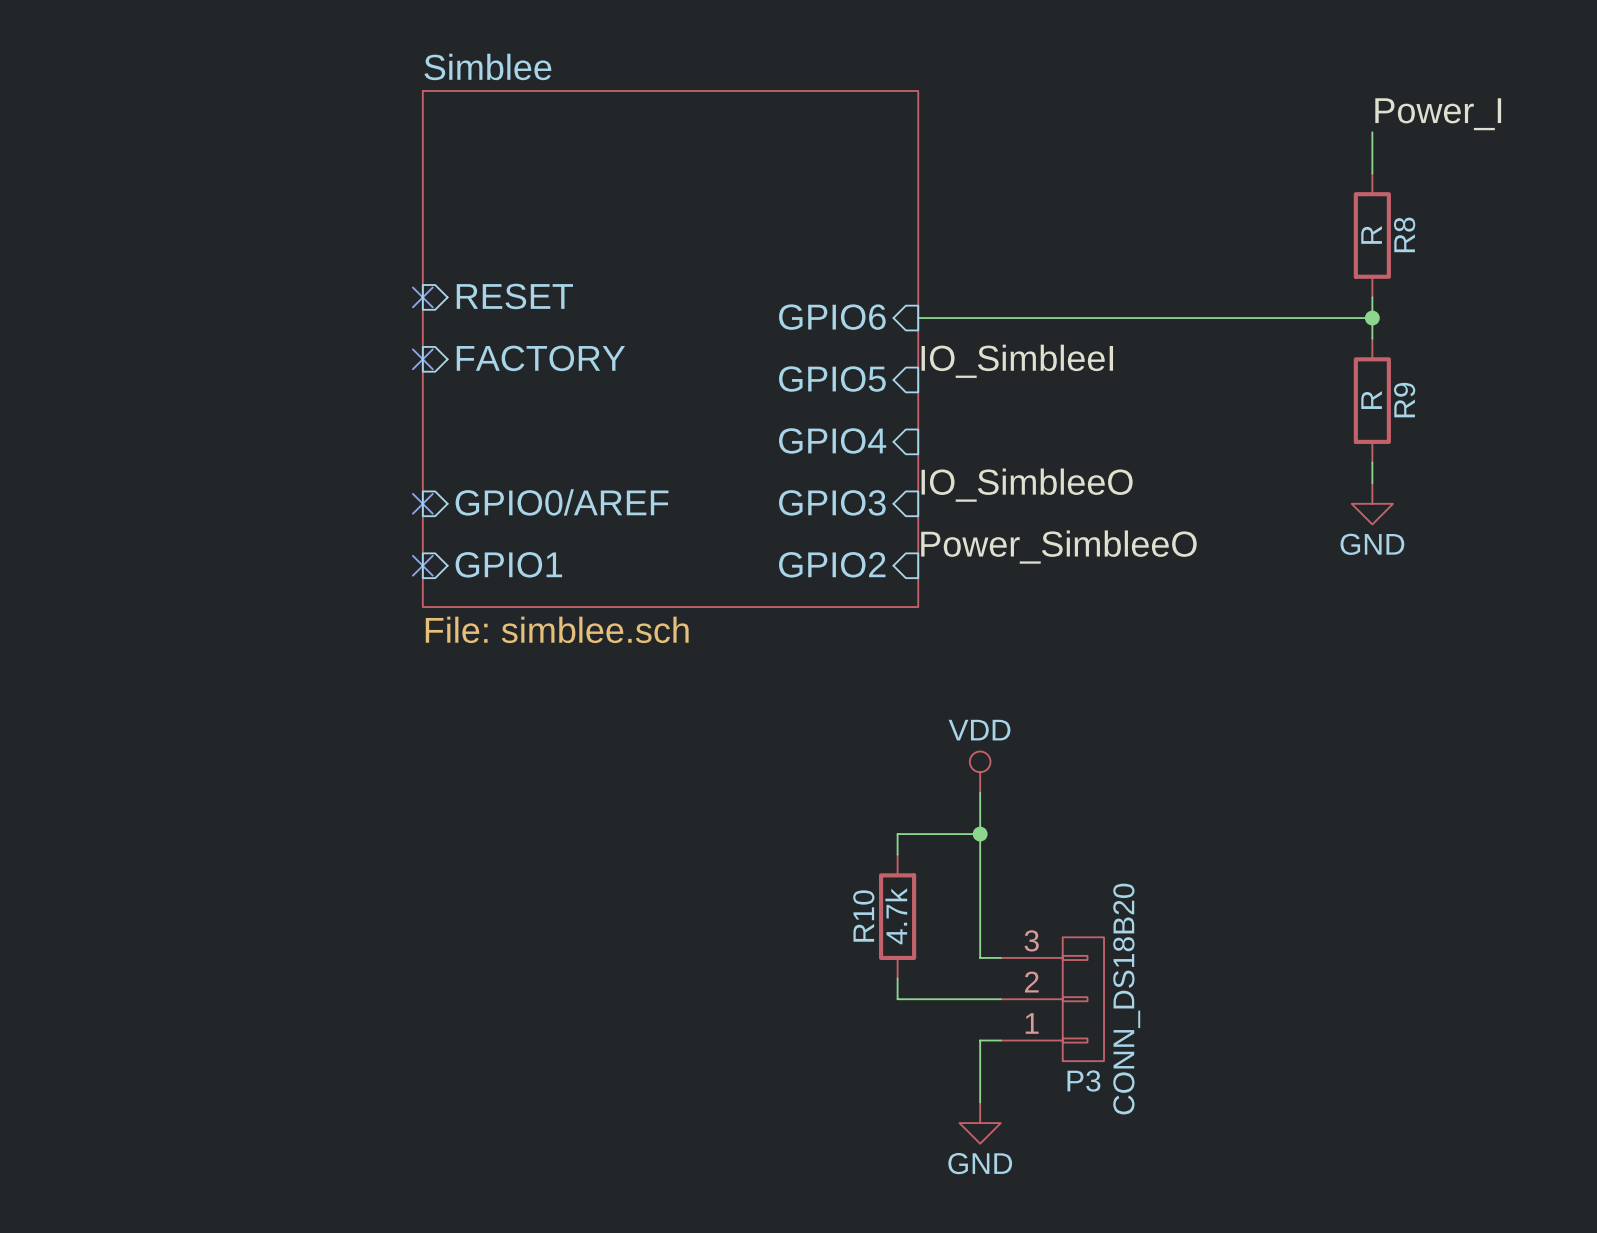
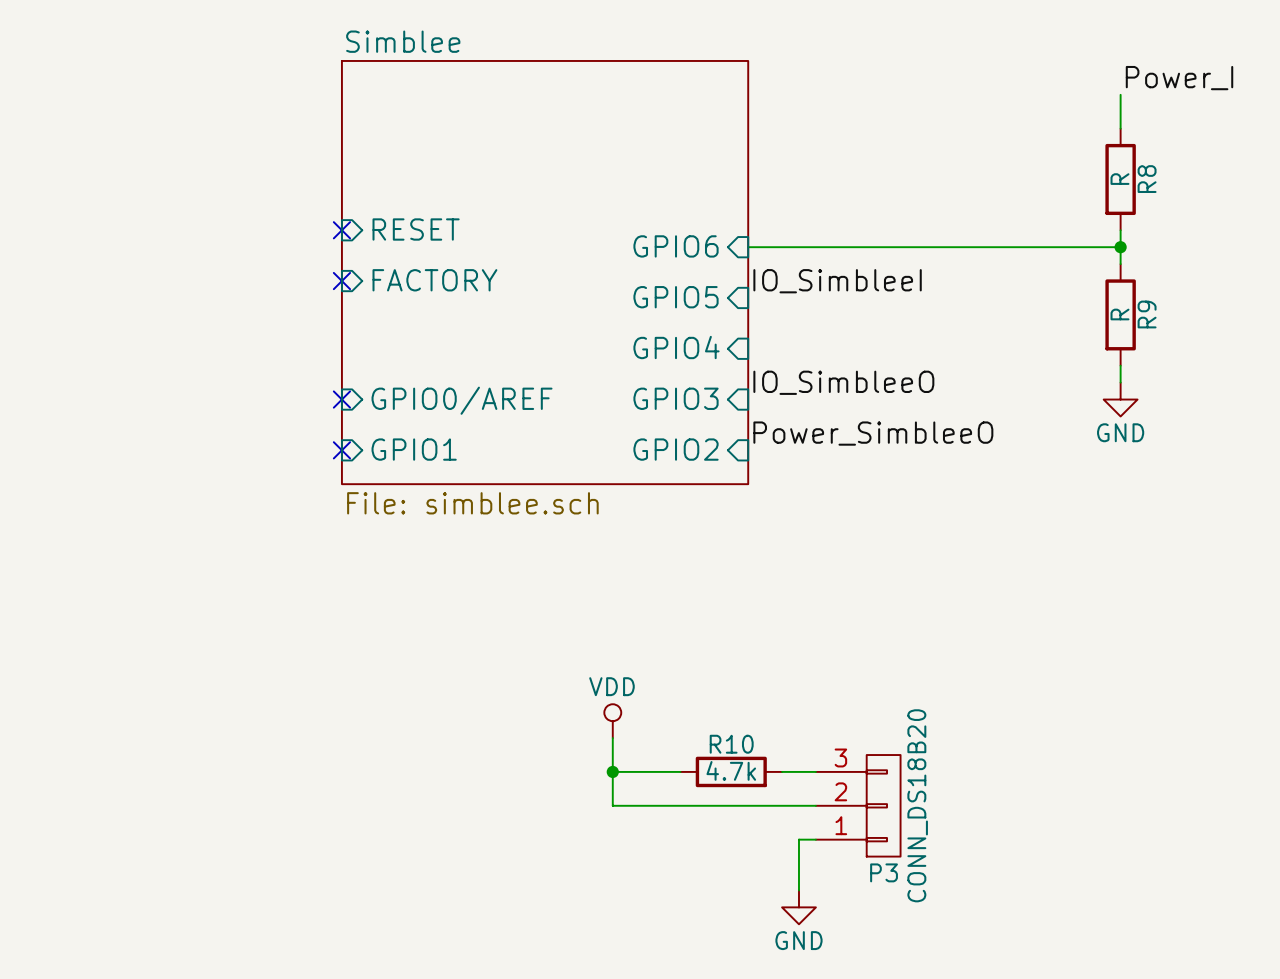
power symbol position: VDD (980, 772) -> VDD (612, 721)
wire: (980, 792) (980, 957) -> (782, 771) (798, 771)
wire: (980, 834) (897, 834) (897, 854) -> none
junction: (980, 834) -> none
R10 rotation: 0° (897, 916) -> 90° clockwise (731, 771)
wire: none -> (612, 771) (680, 771)
junction: none -> (612, 771)
wire: (897, 978) (897, 999) -> (612, 738) (612, 805) (731, 805)

